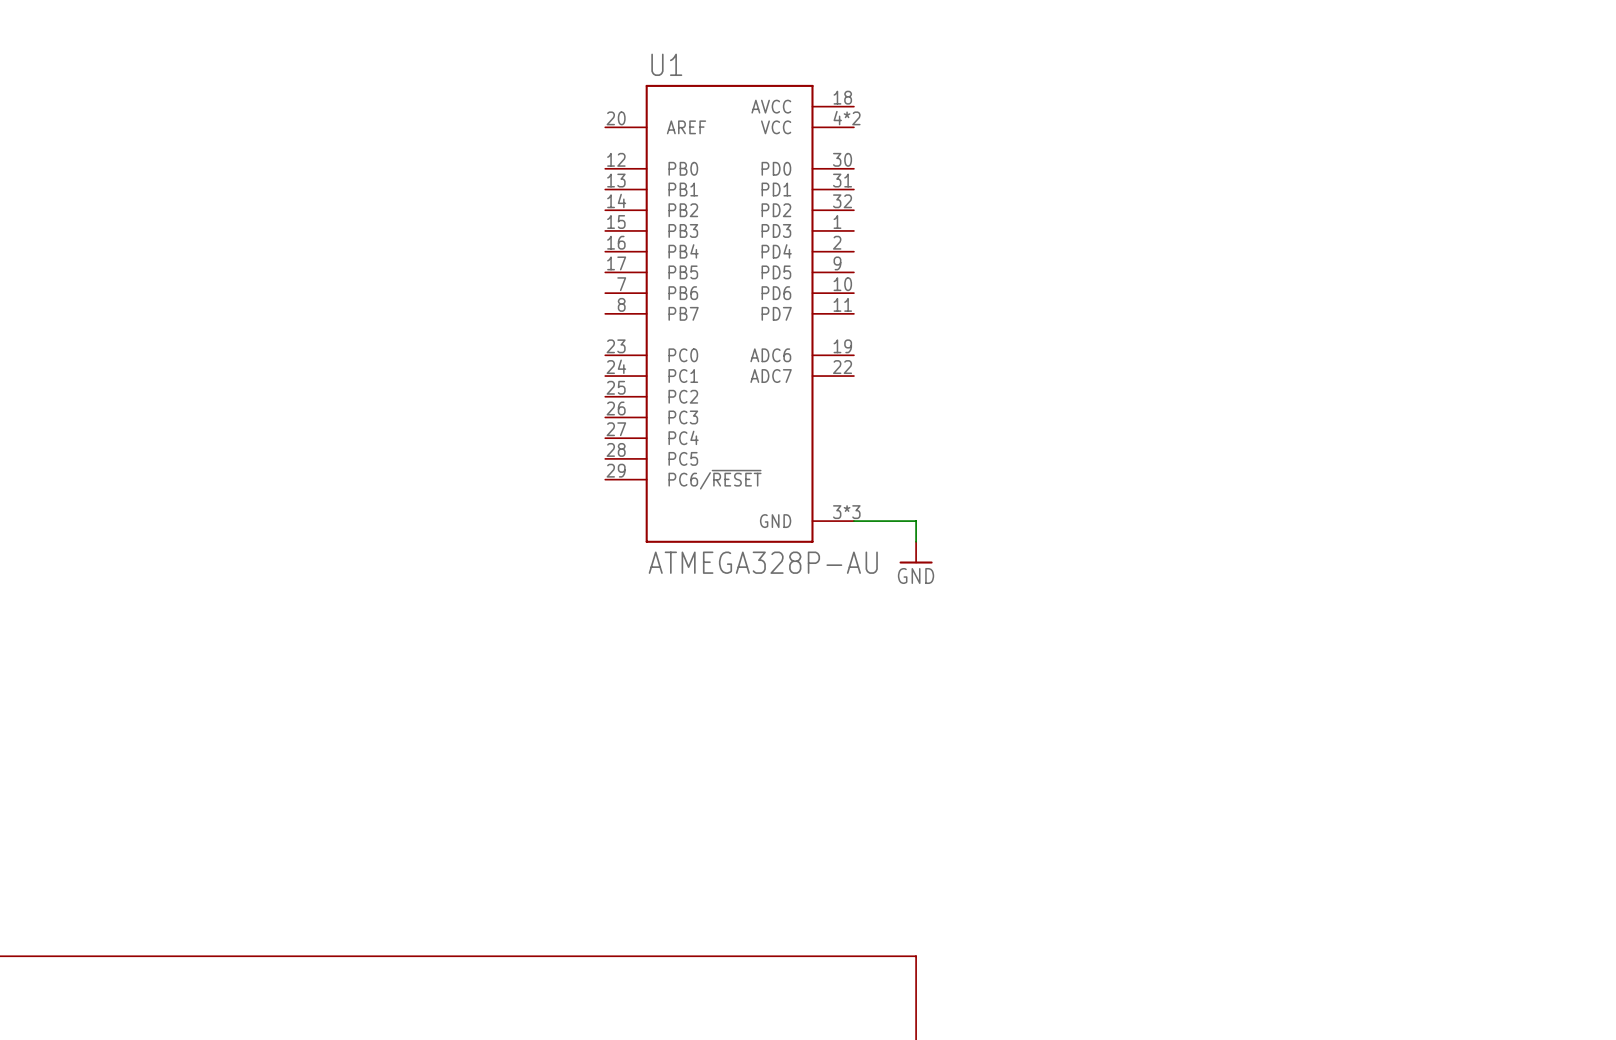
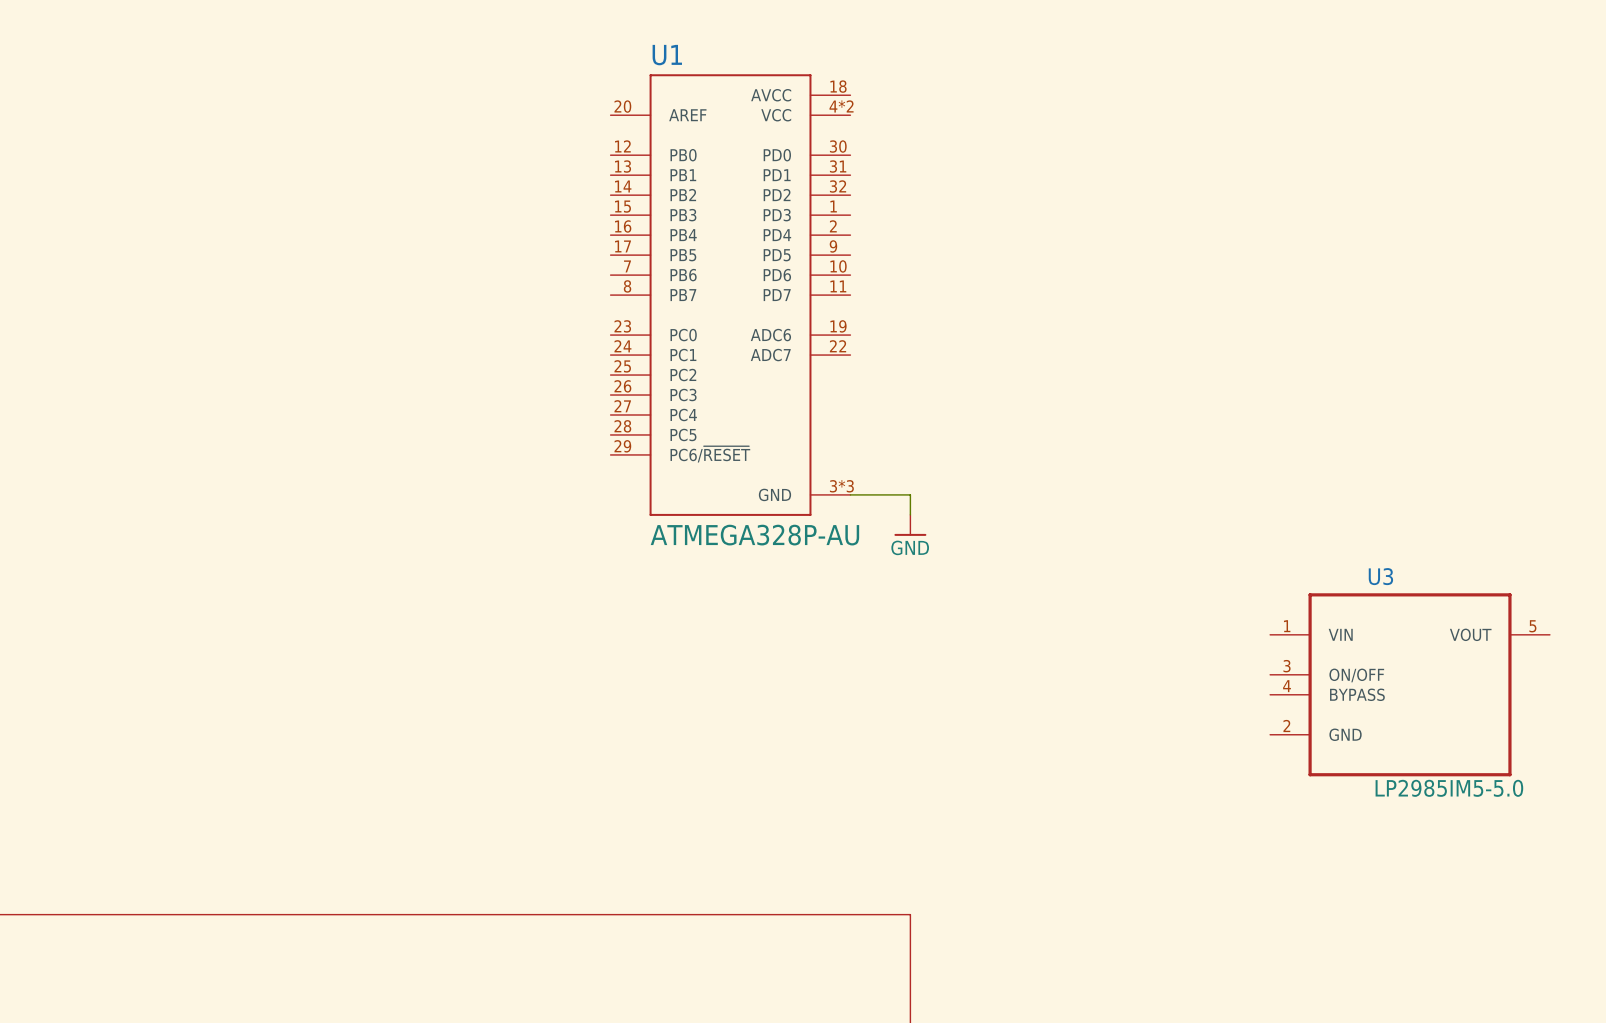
U3: none -> LP2985IM5-5.0 (1410, 684)

